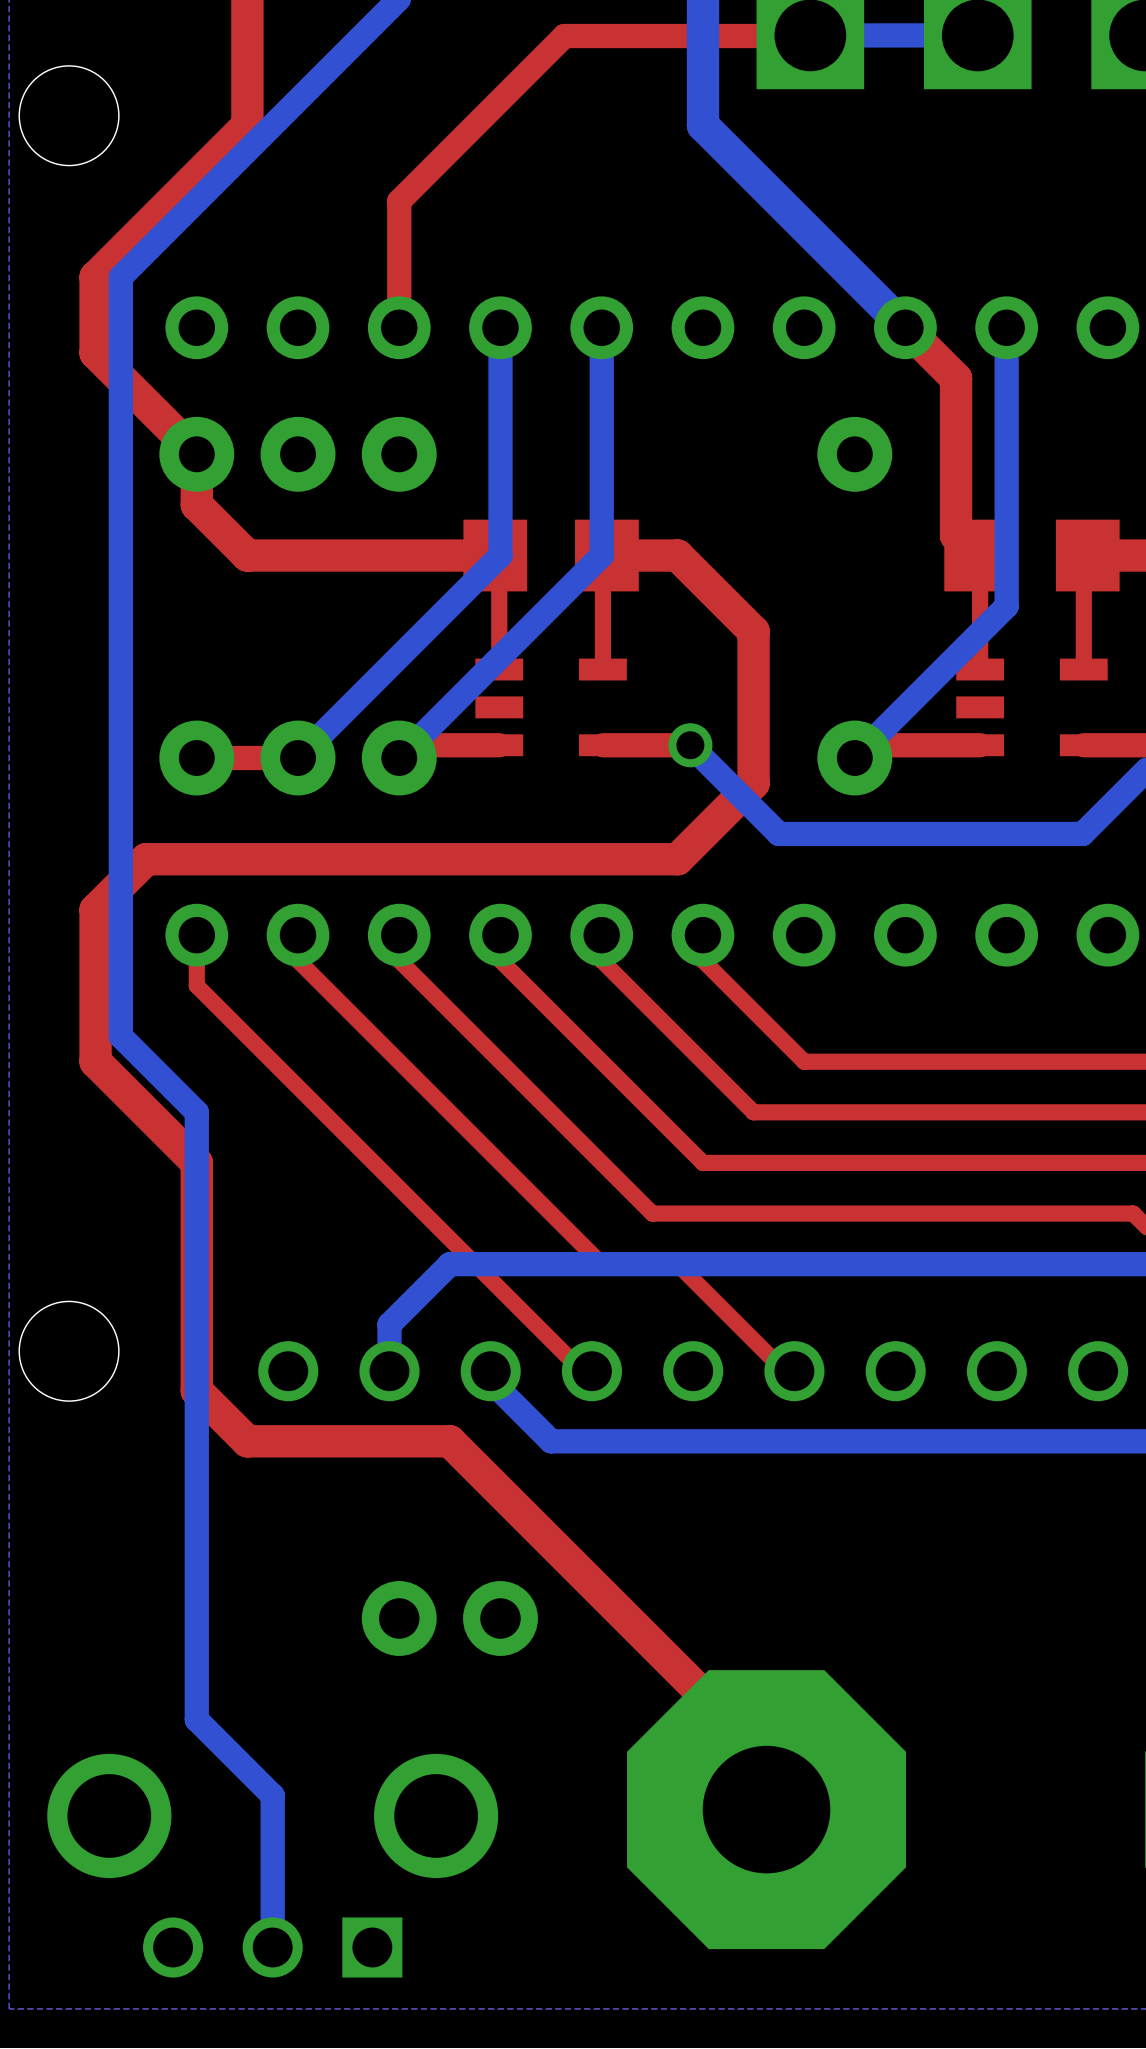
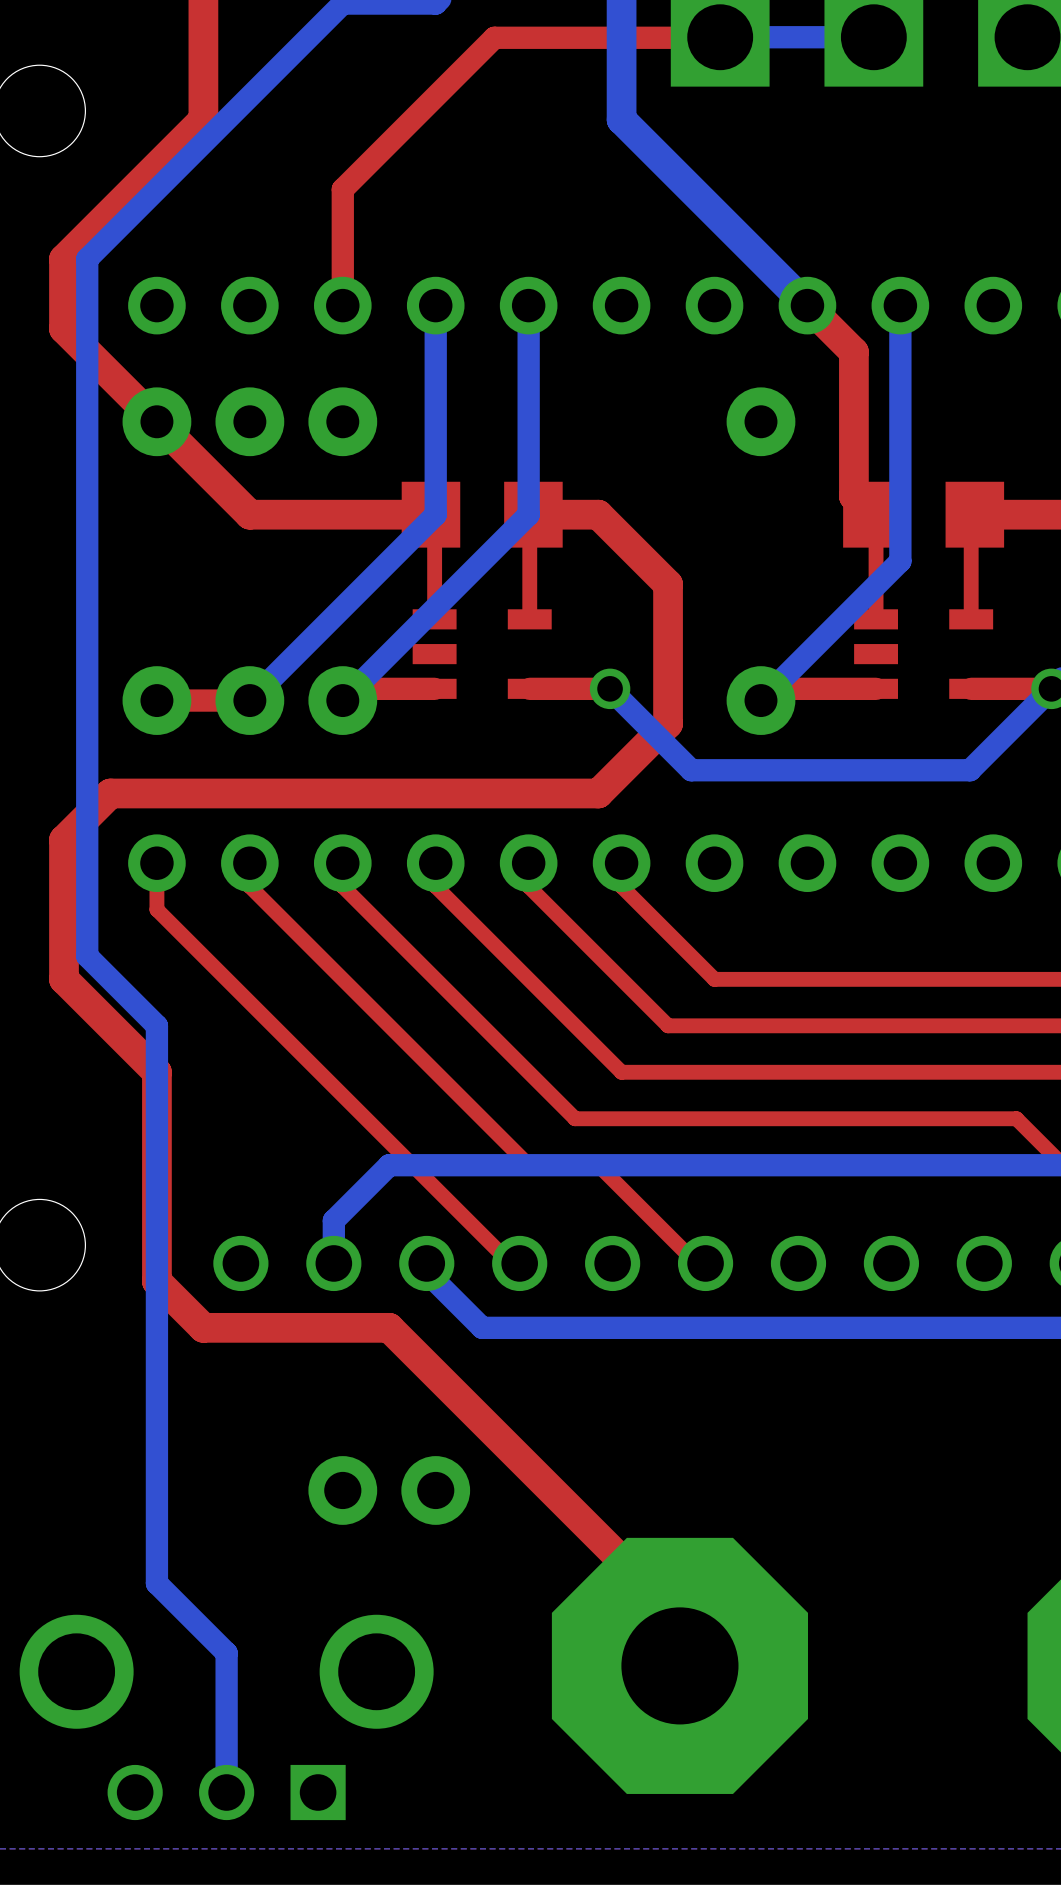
top track: (196, 454) (196, 504) (247, 555) (298, 555) -> (156, 421) (249, 514)

